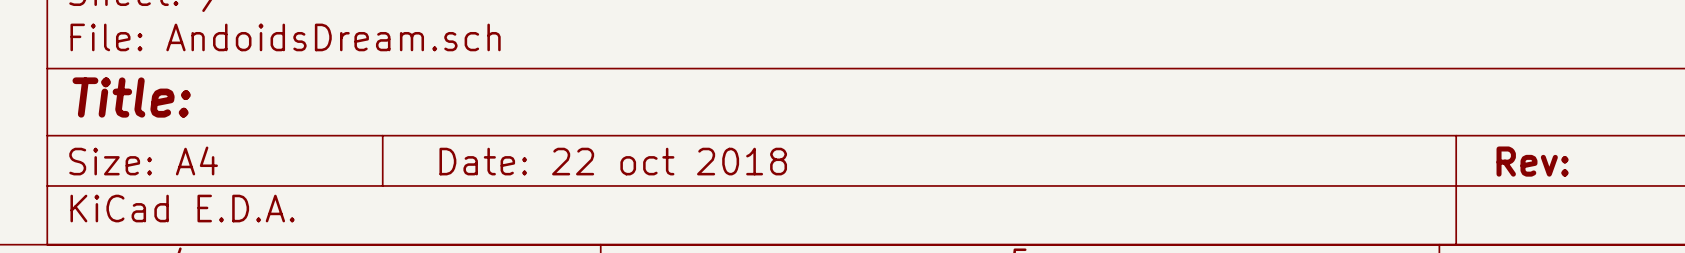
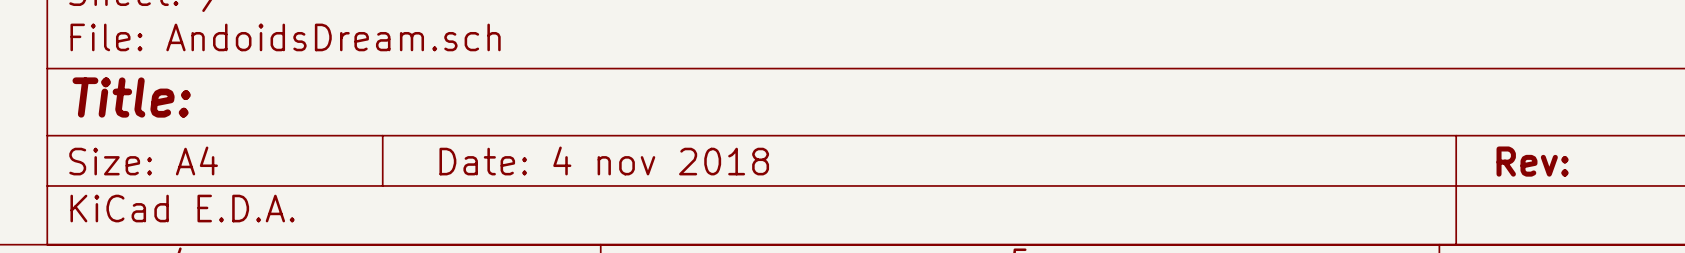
title block: Date: 22 oct 2018 (613, 161) -> Date: 4 nov 2018 (604, 160)

